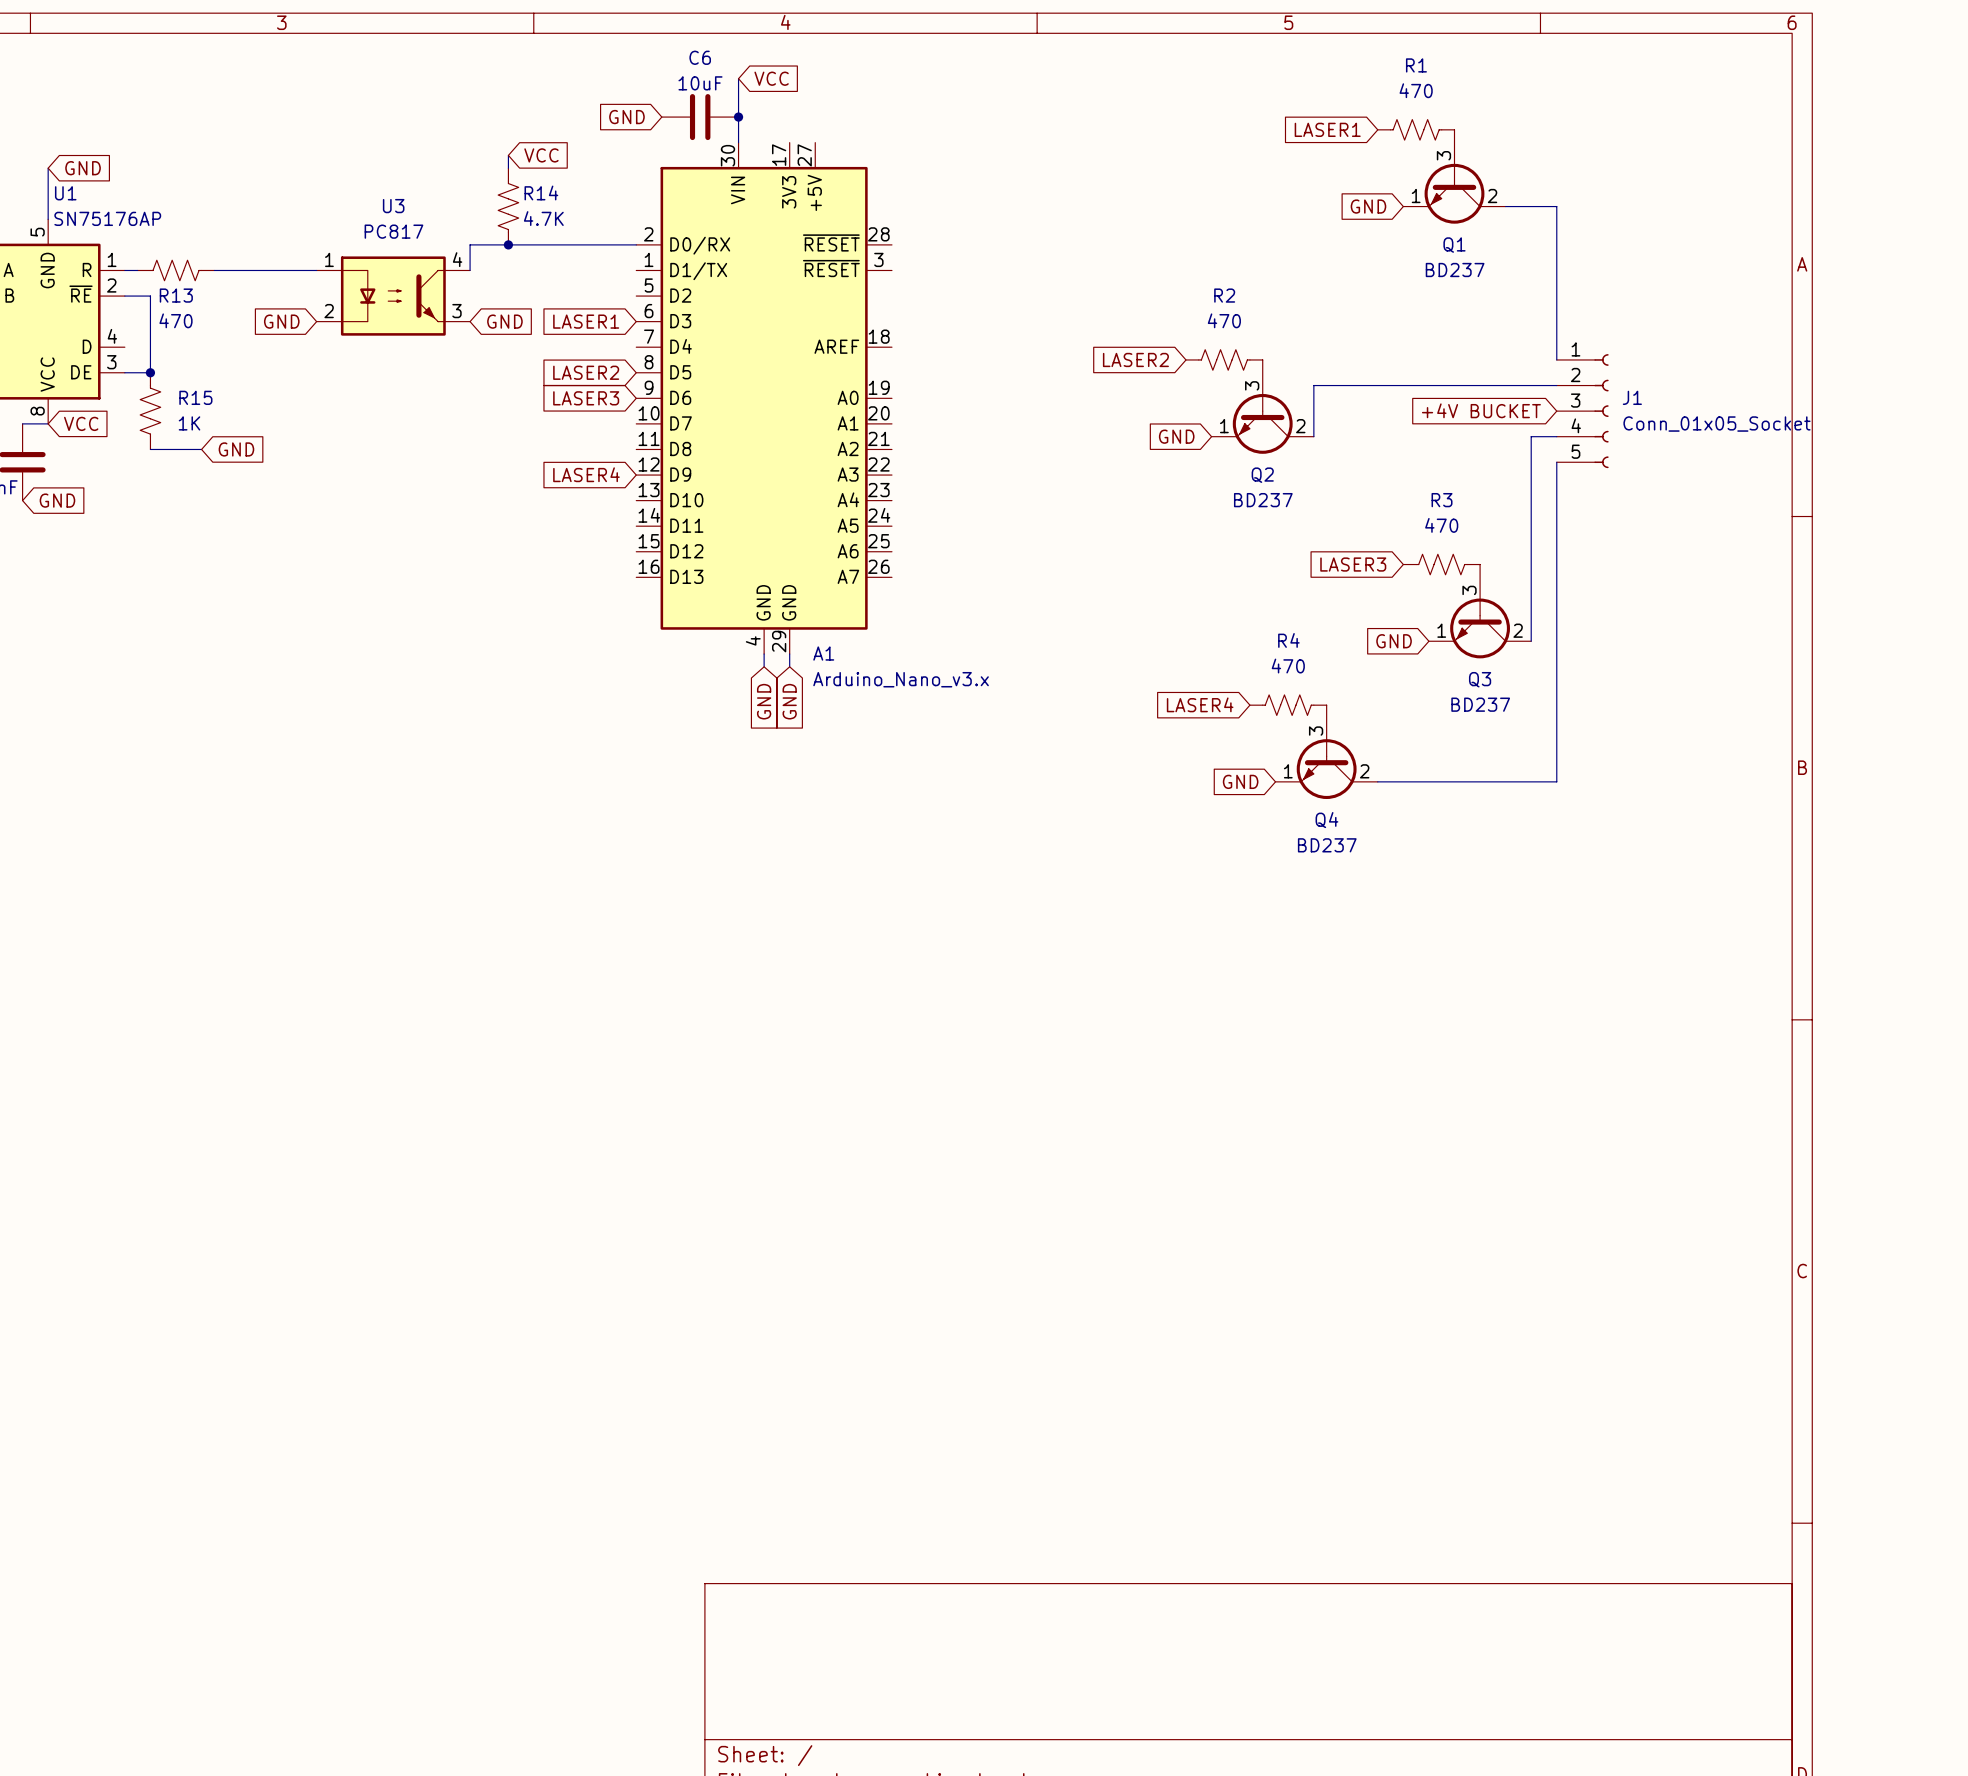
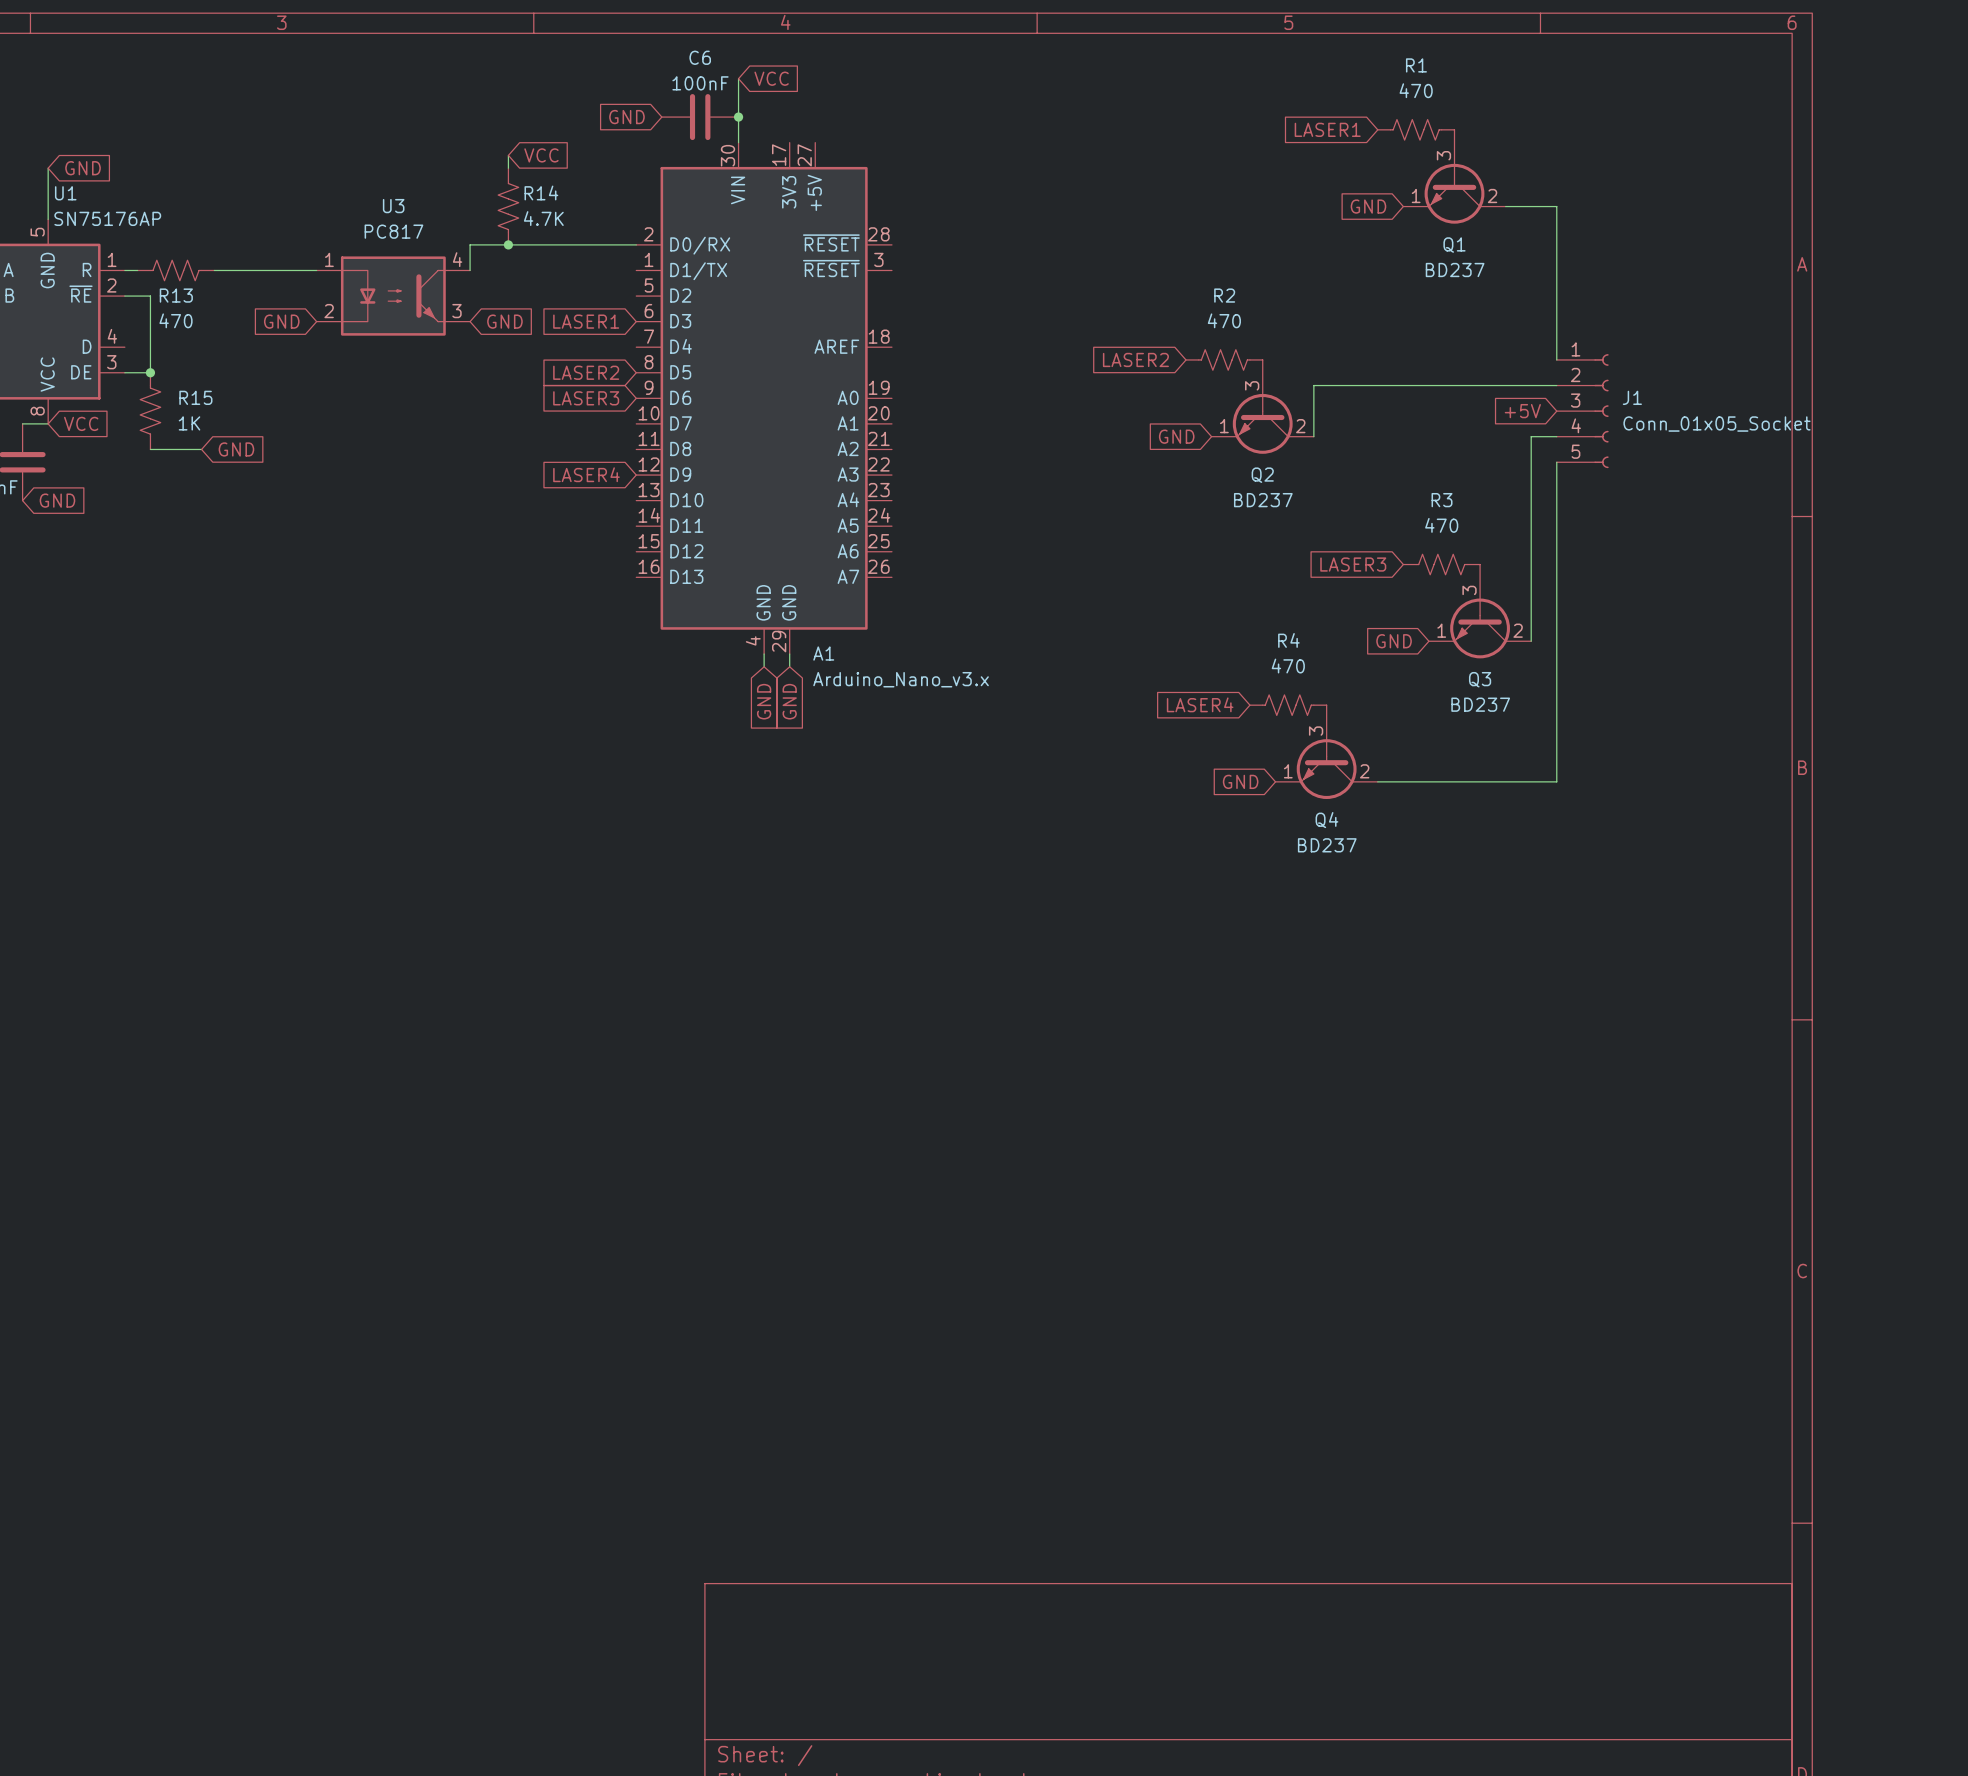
C6 value: 10uF (700, 83) -> 100nF (700, 83)
global label: +4V BUCKET (1481, 410) -> +5V (1522, 411)

